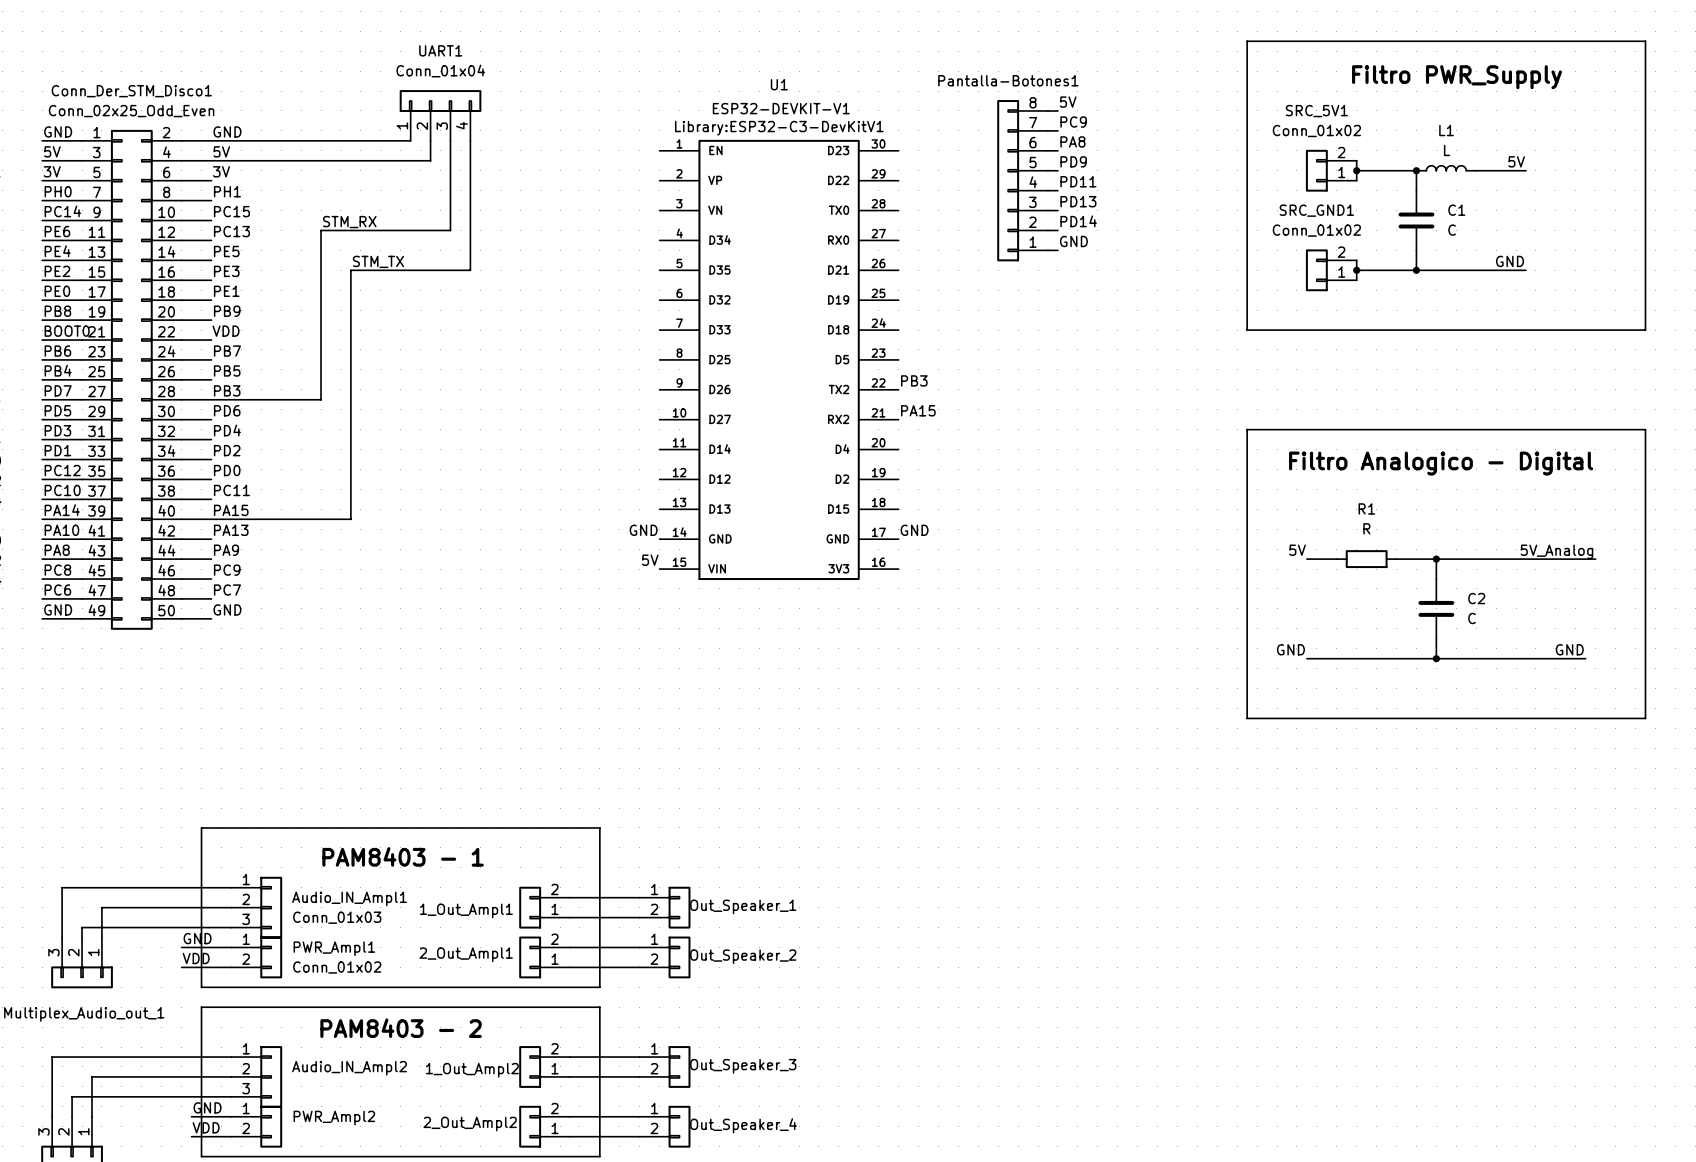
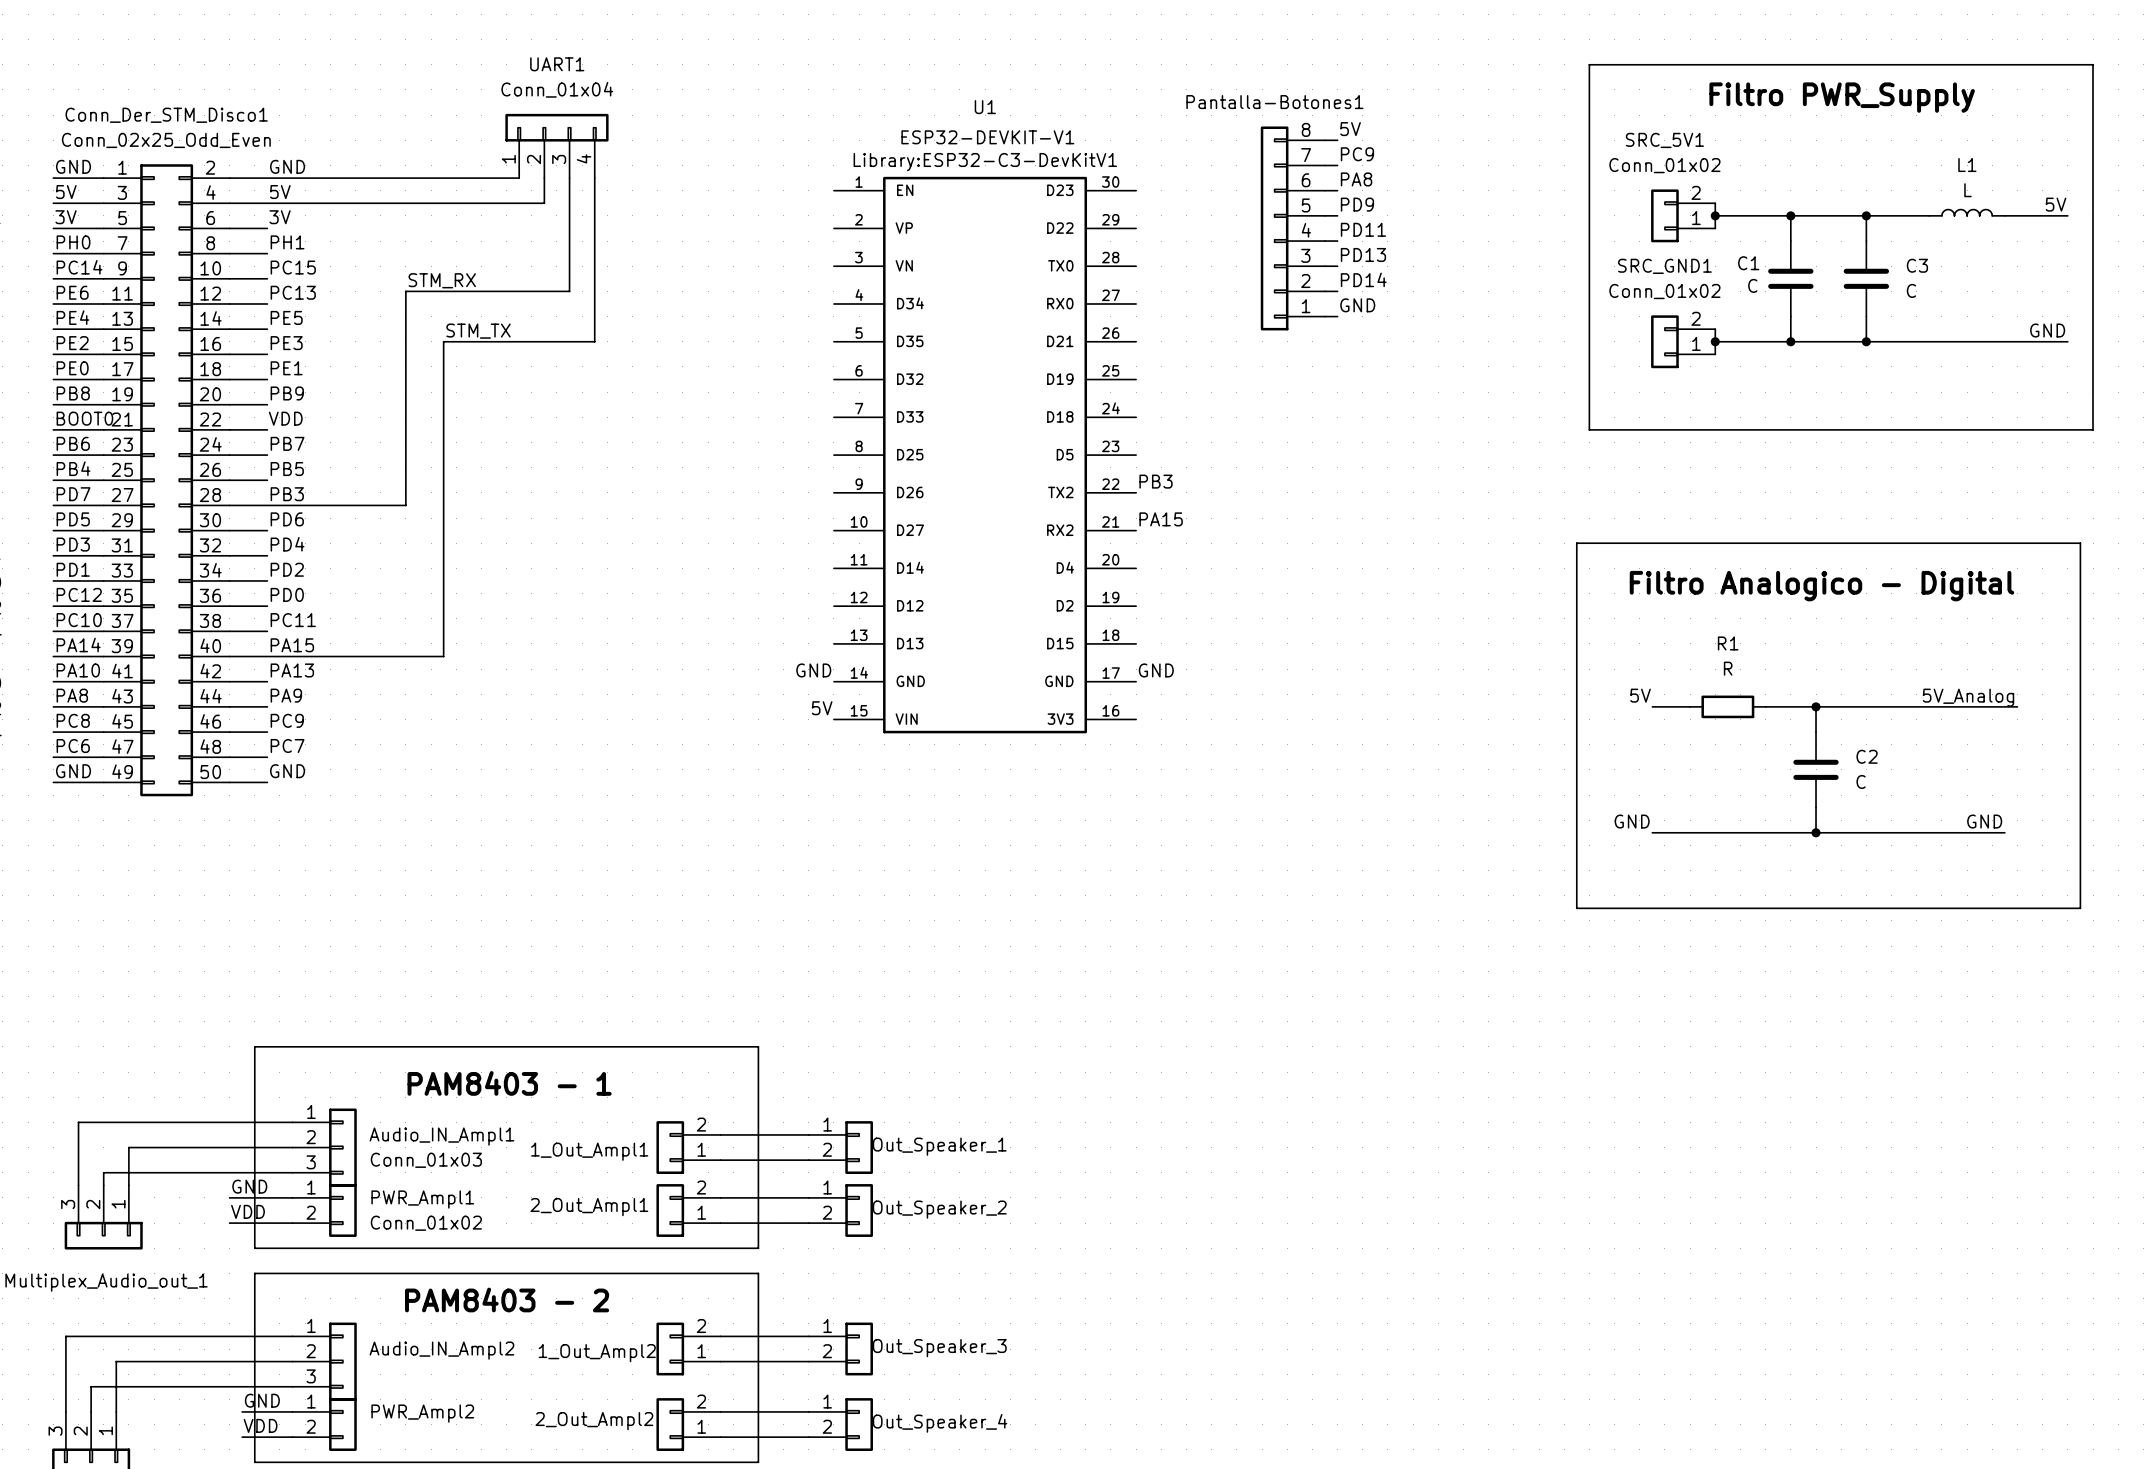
line: (1247, 41) (1645, 41) (1645, 330) (1247, 330) (1247, 41) -> (1589, 64) (2093, 64) (2093, 429) (1589, 429) (1589, 64)
label position: 5V (1516, 161) -> 5V (2056, 204)
L1 position: (1446, 168) -> (1967, 212)
wire: none -> (1790, 215) (1866, 215) (1866, 241)
junction: none -> (1866, 215)
wire: none -> (2004, 215) (2067, 215)
C1 name position: C1 (1456, 210) -> C1 (1748, 263)
C3: none -> C (1866, 278)
C1 value position: C (1452, 230) -> C (1752, 285)
wire: none -> (1866, 316) (1866, 341)
label position: GND (1510, 261) -> GND (2047, 330)
junction: none -> (1866, 341)
wire: none -> (1929, 341) (2067, 341)

